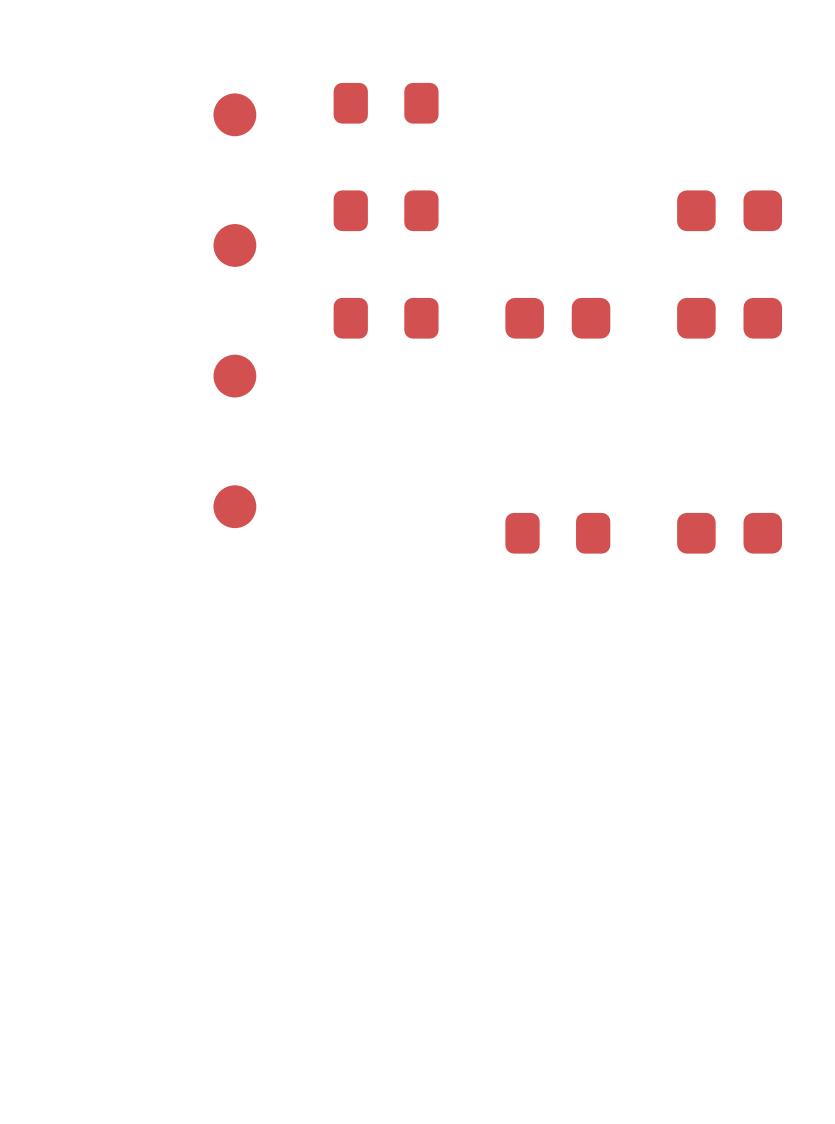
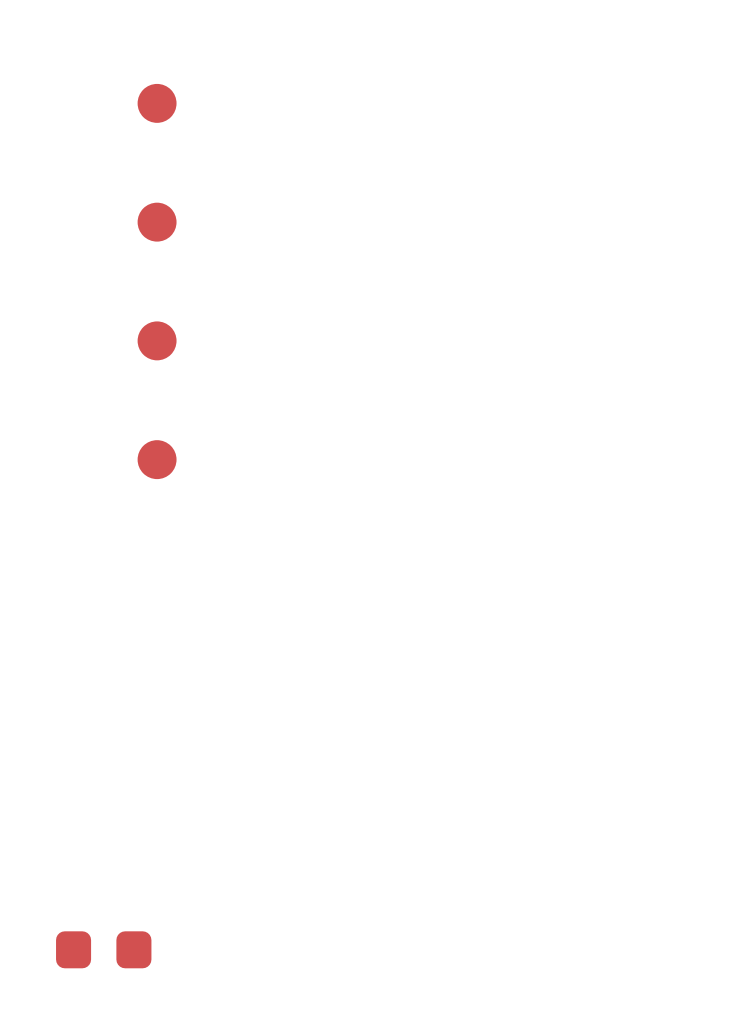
part: (386, 103) -> none
part: (386, 210) -> none
part: (729, 210) -> none
part: (386, 318) -> none
part: (557, 318) -> none
part: (729, 318) -> none
part: (557, 533) -> none
part: (729, 533) -> none
part: none -> (103, 949)

